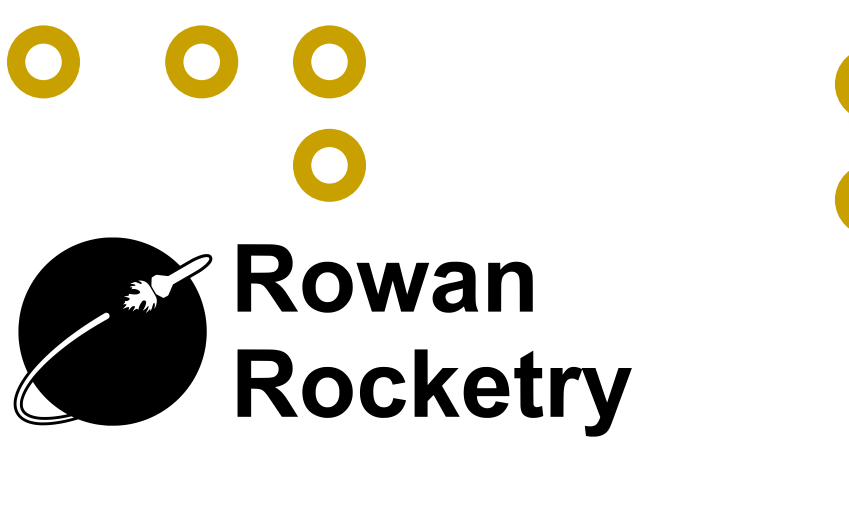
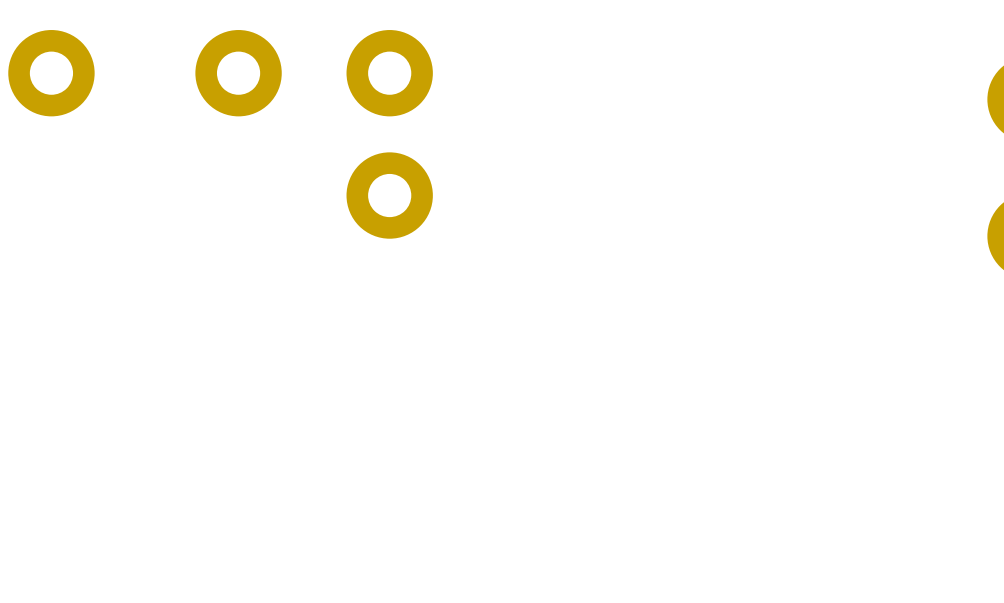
drawing: [13, 237, 632, 437] -> none

